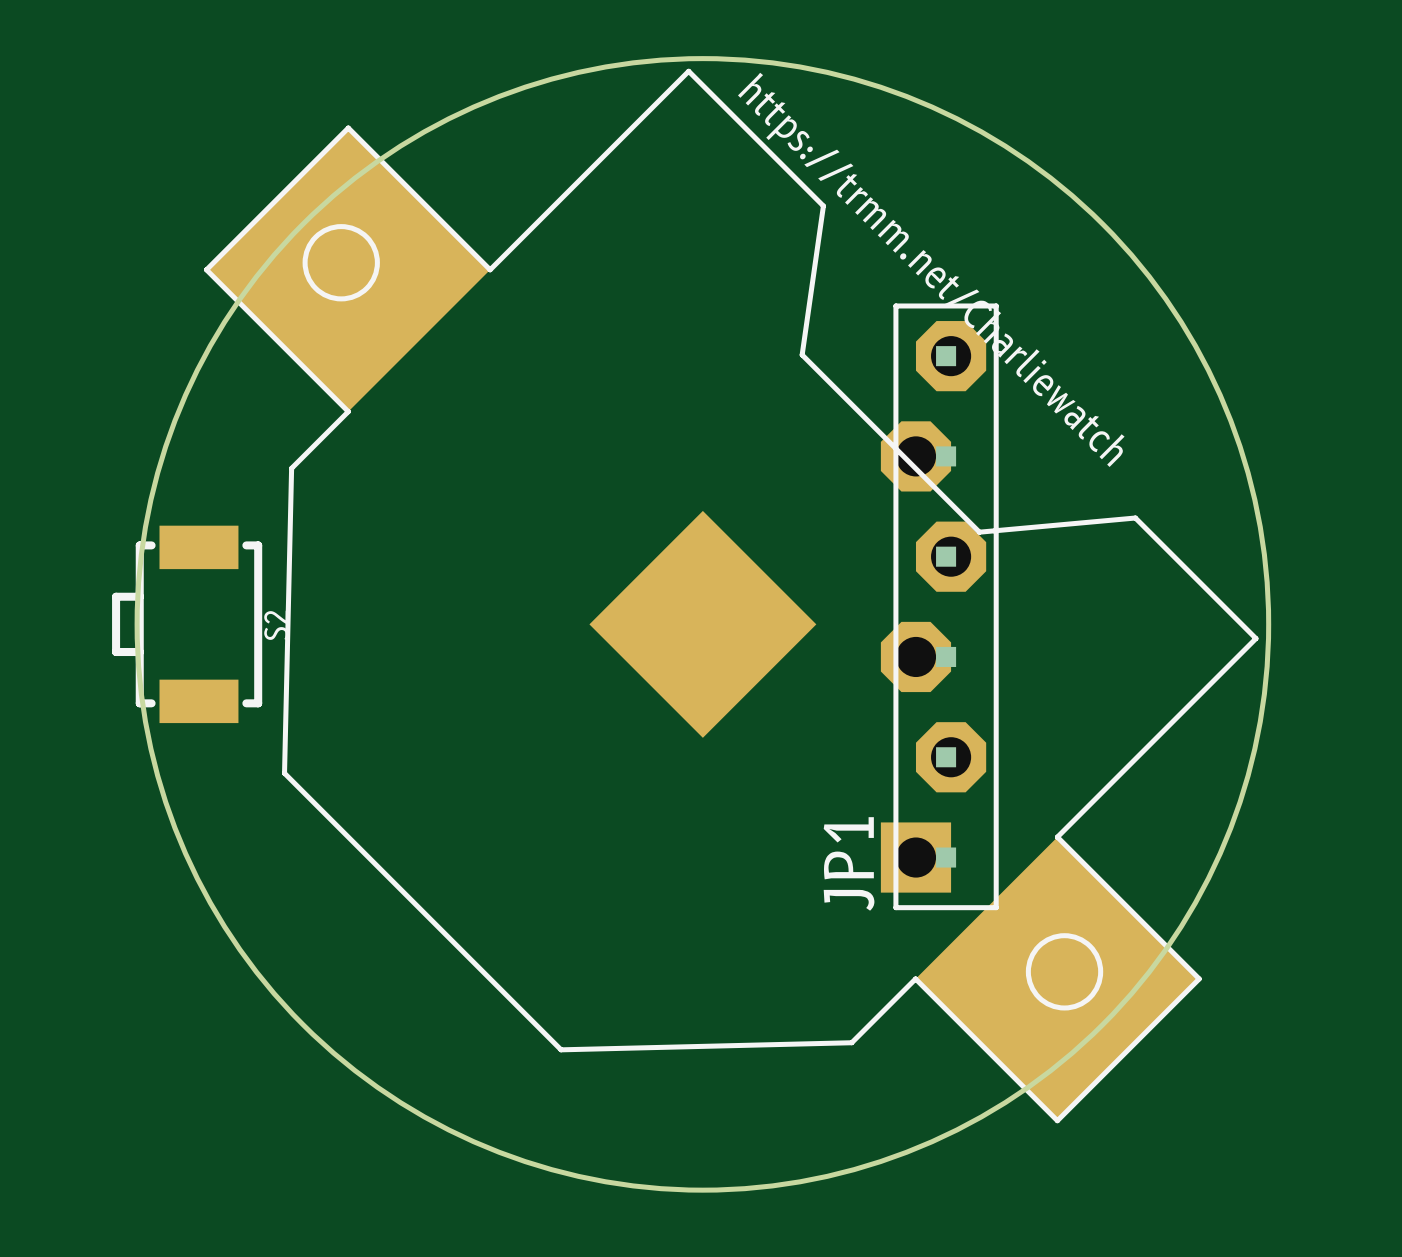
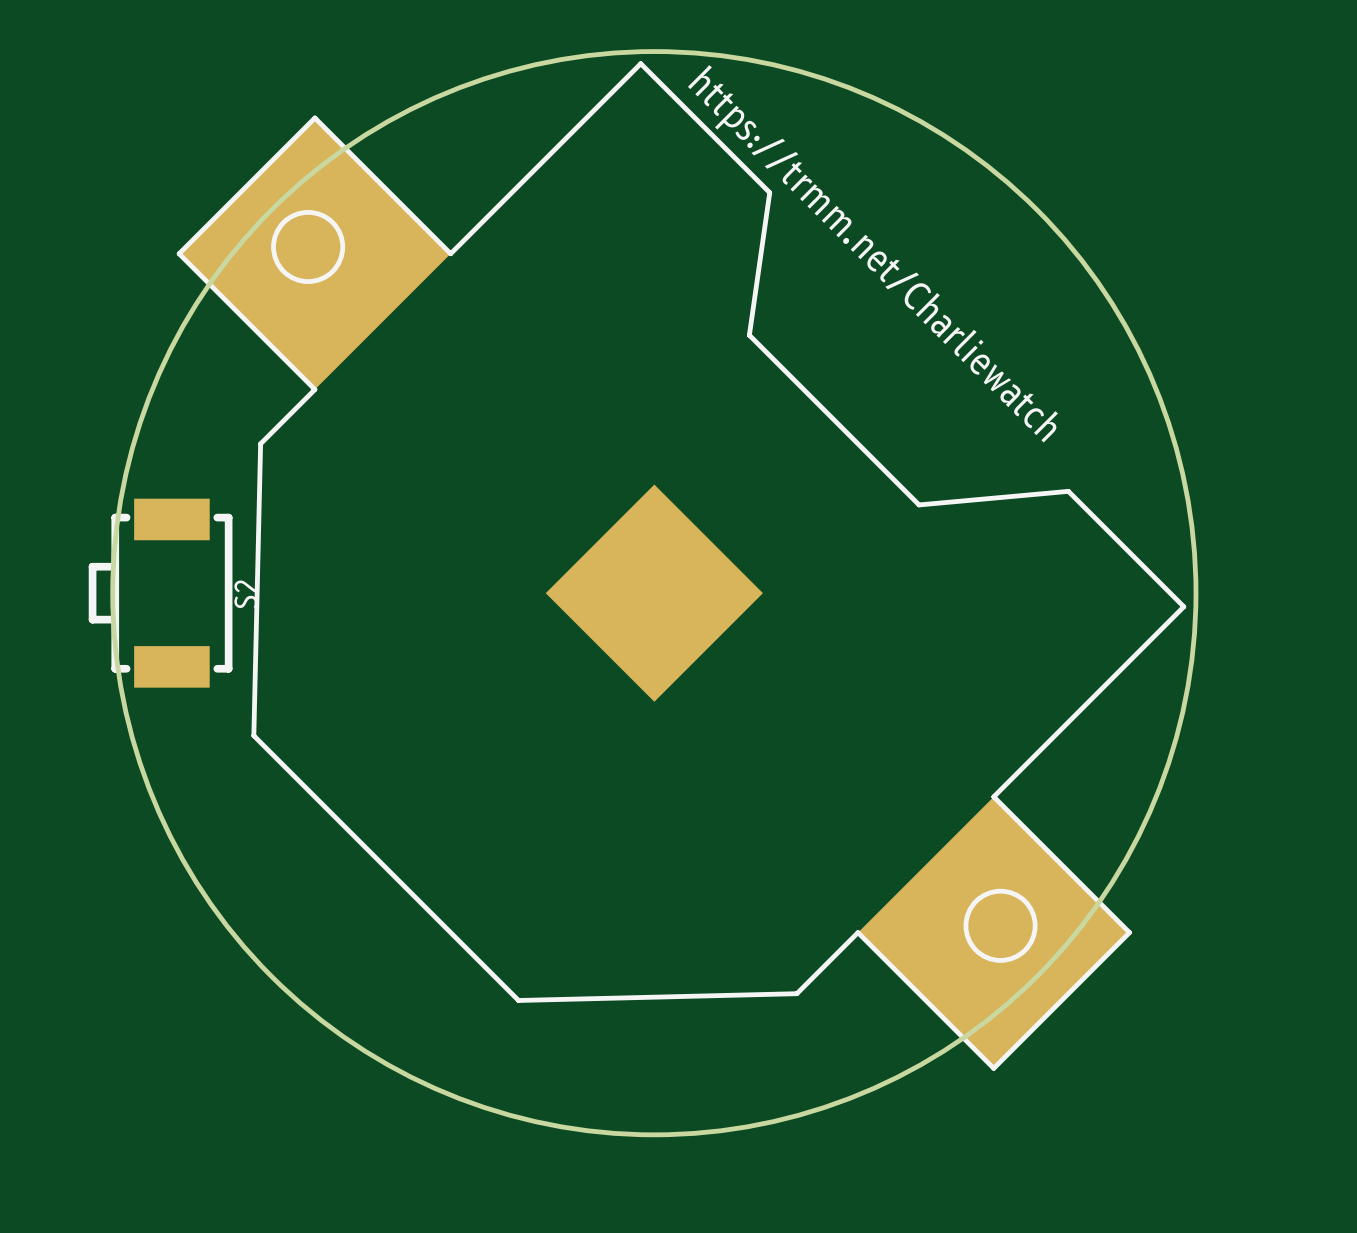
JP1: (939, 606) -> none

